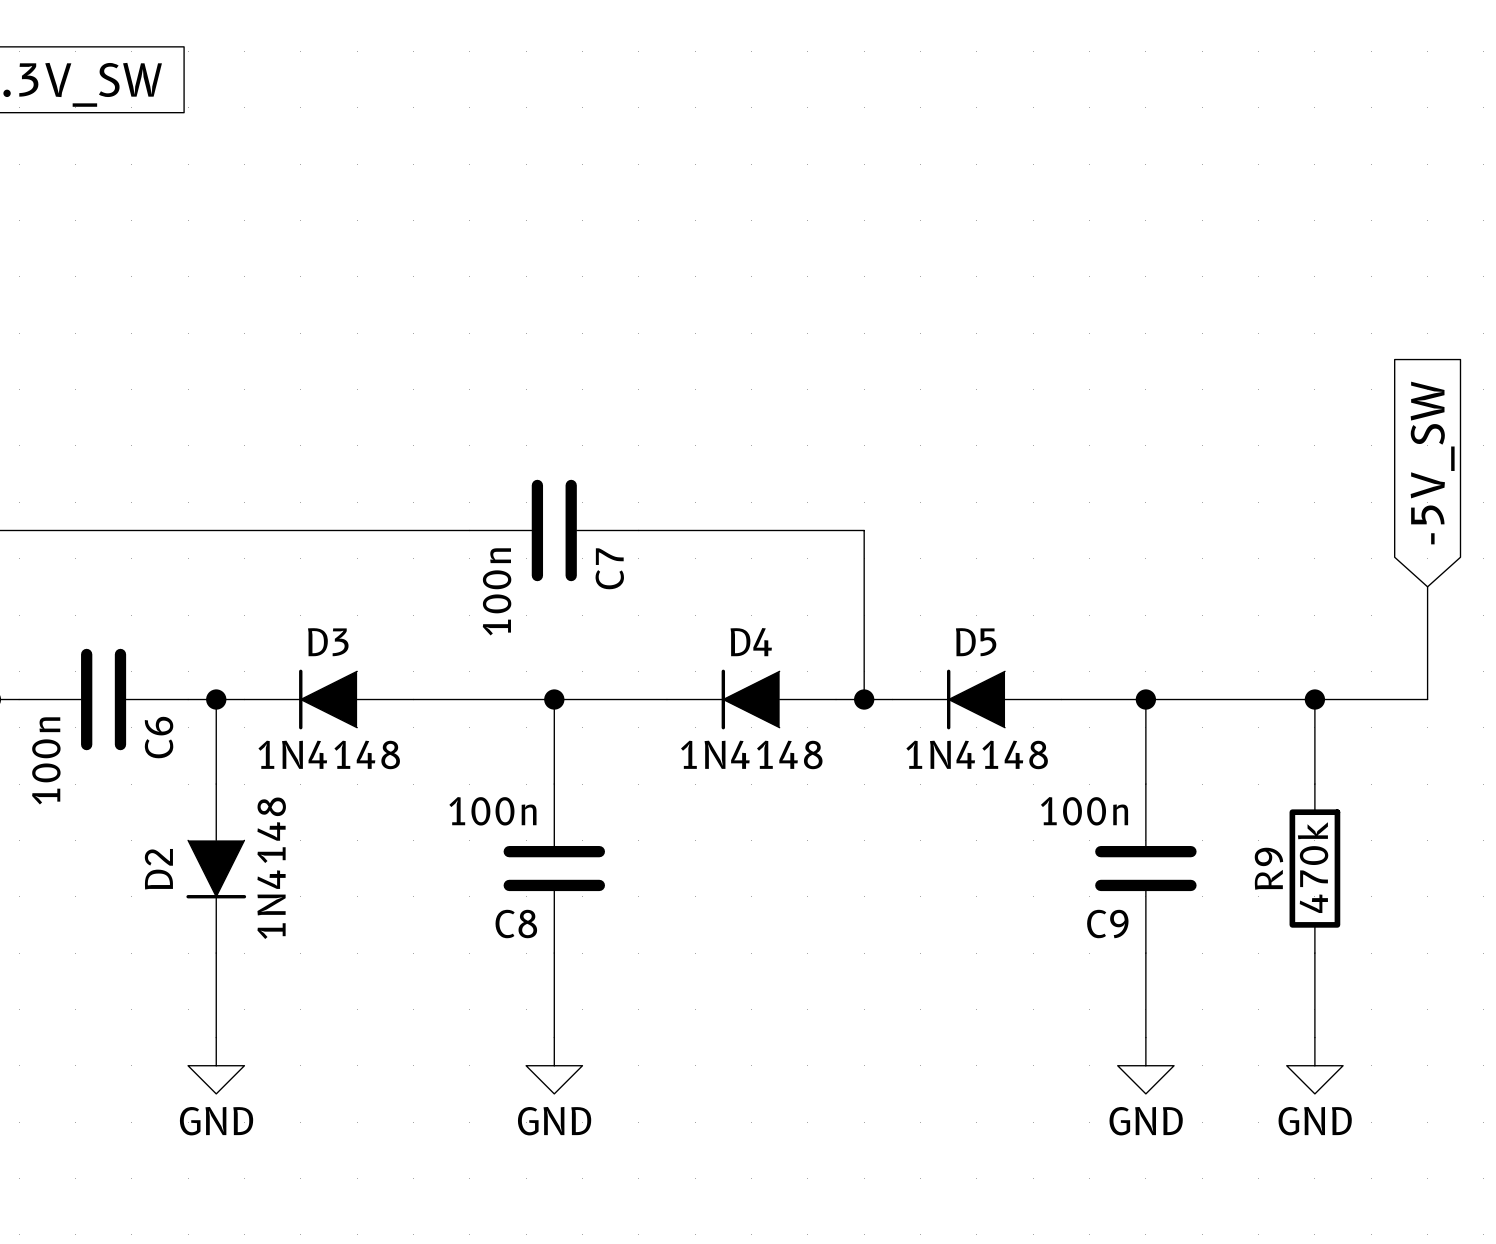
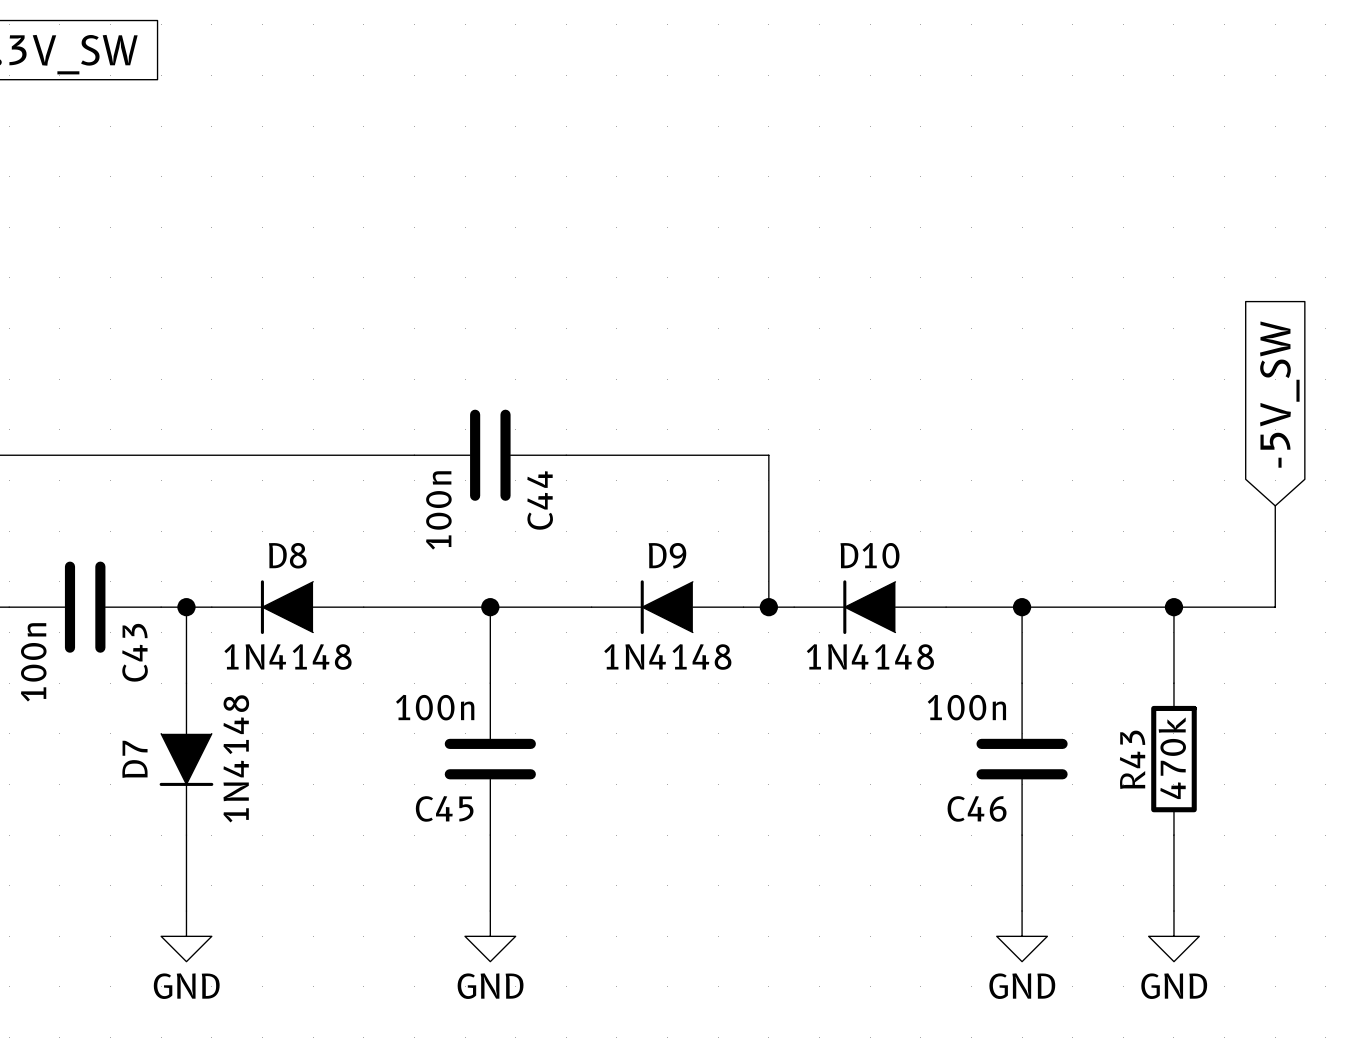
C7 name: C7 (609, 568) -> C44 (540, 500)
D3 name: D3 (328, 642) -> D8 (287, 555)
D4 name: D4 (751, 642) -> D9 (667, 555)
D5 name: D5 (976, 642) -> D10 (869, 555)
C6 name: C6 (159, 737) -> C43 (135, 652)
R9 name: R9 (1268, 868) -> R43 (1132, 759)
D2 name: D2 (158, 869) -> D7 (134, 759)
C8 name: C8 (516, 924) -> C45 (444, 808)
C9 name: C9 (1107, 924) -> C46 (977, 808)

